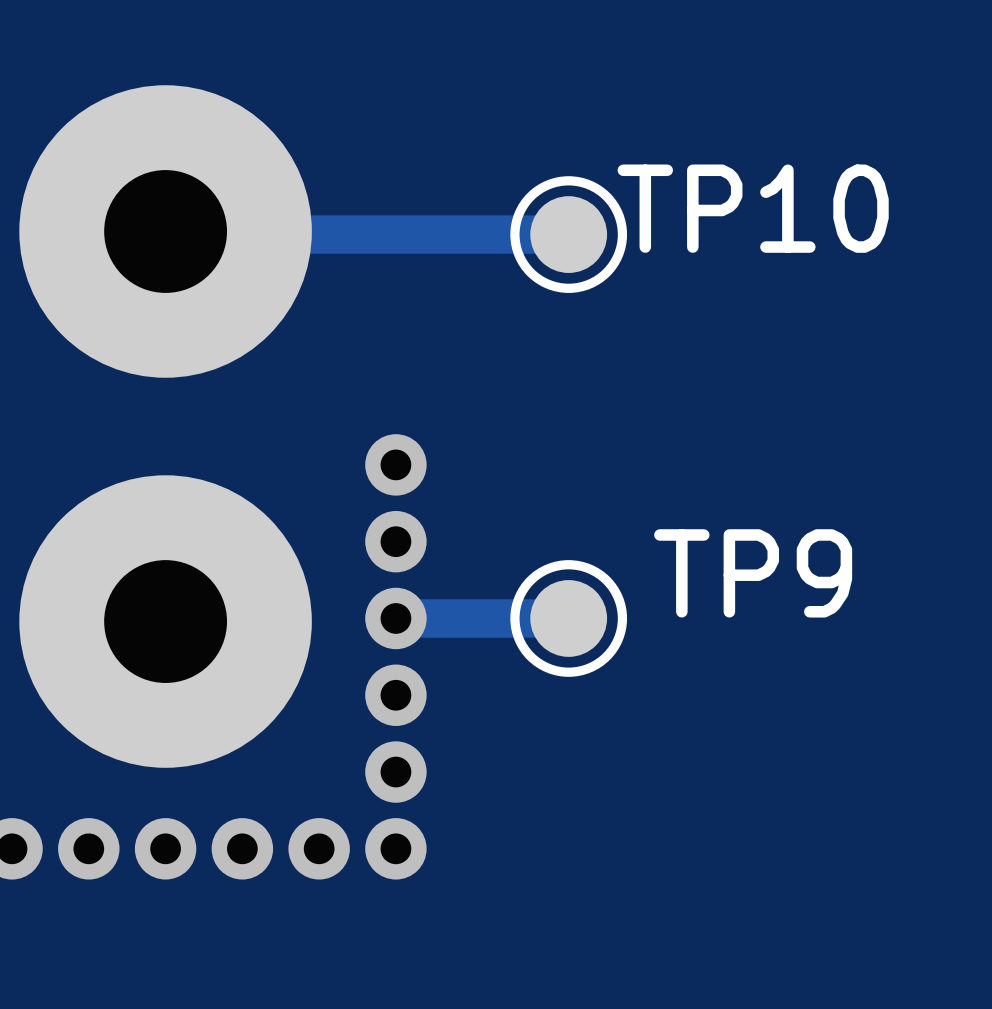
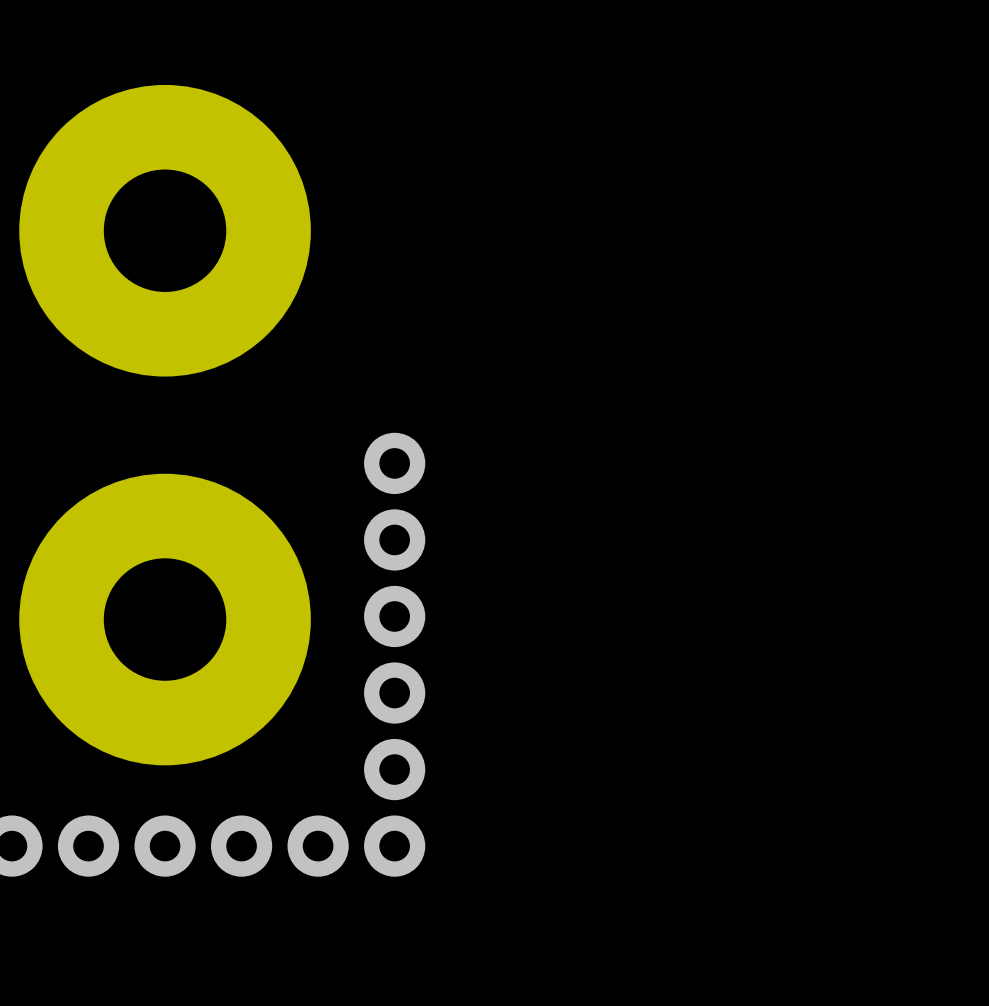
track: (165, 231) (168, 234) (568, 234) -> none
TP10: (568, 234) -> none
track: (568, 618) (395, 618) -> none
TP9: (568, 618) -> none

